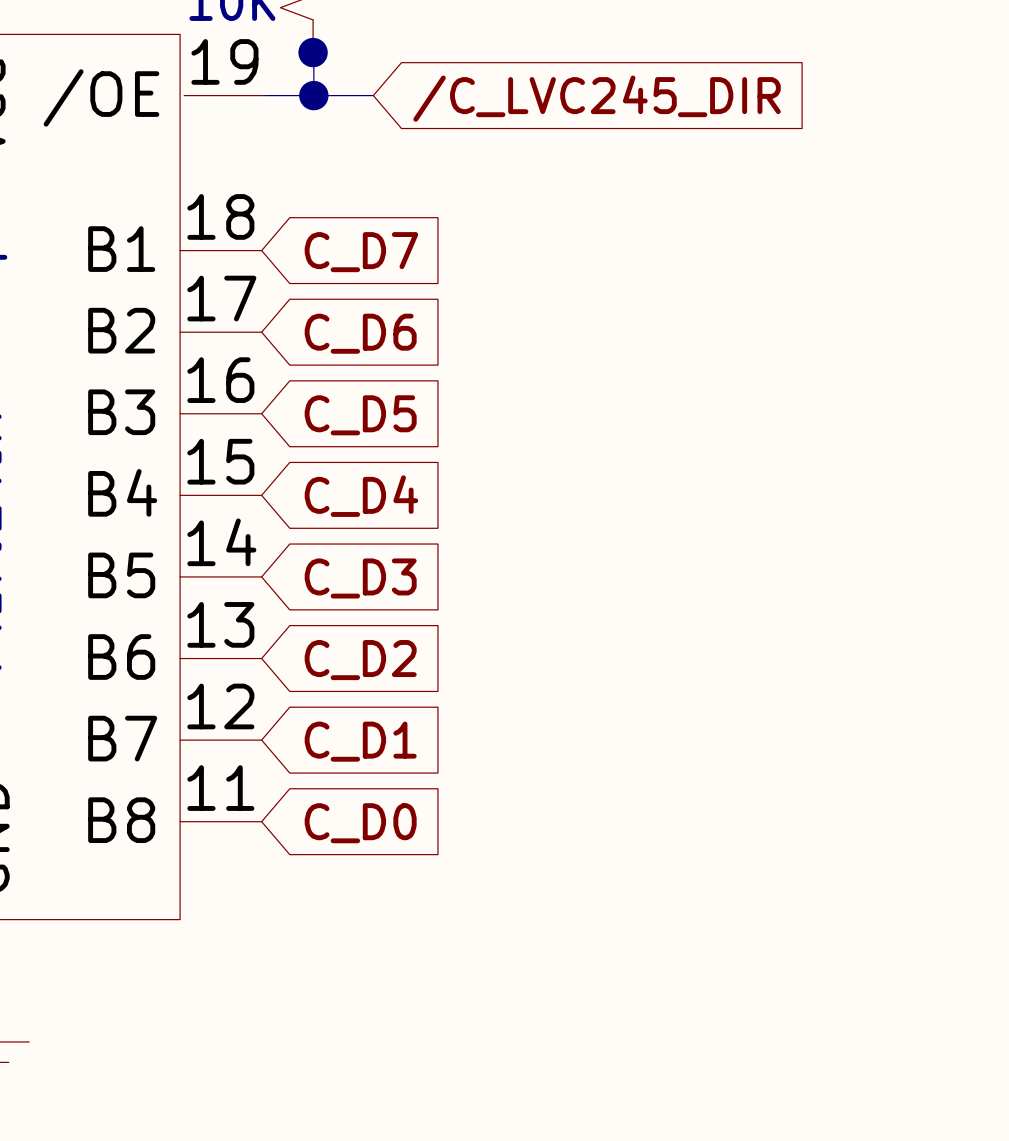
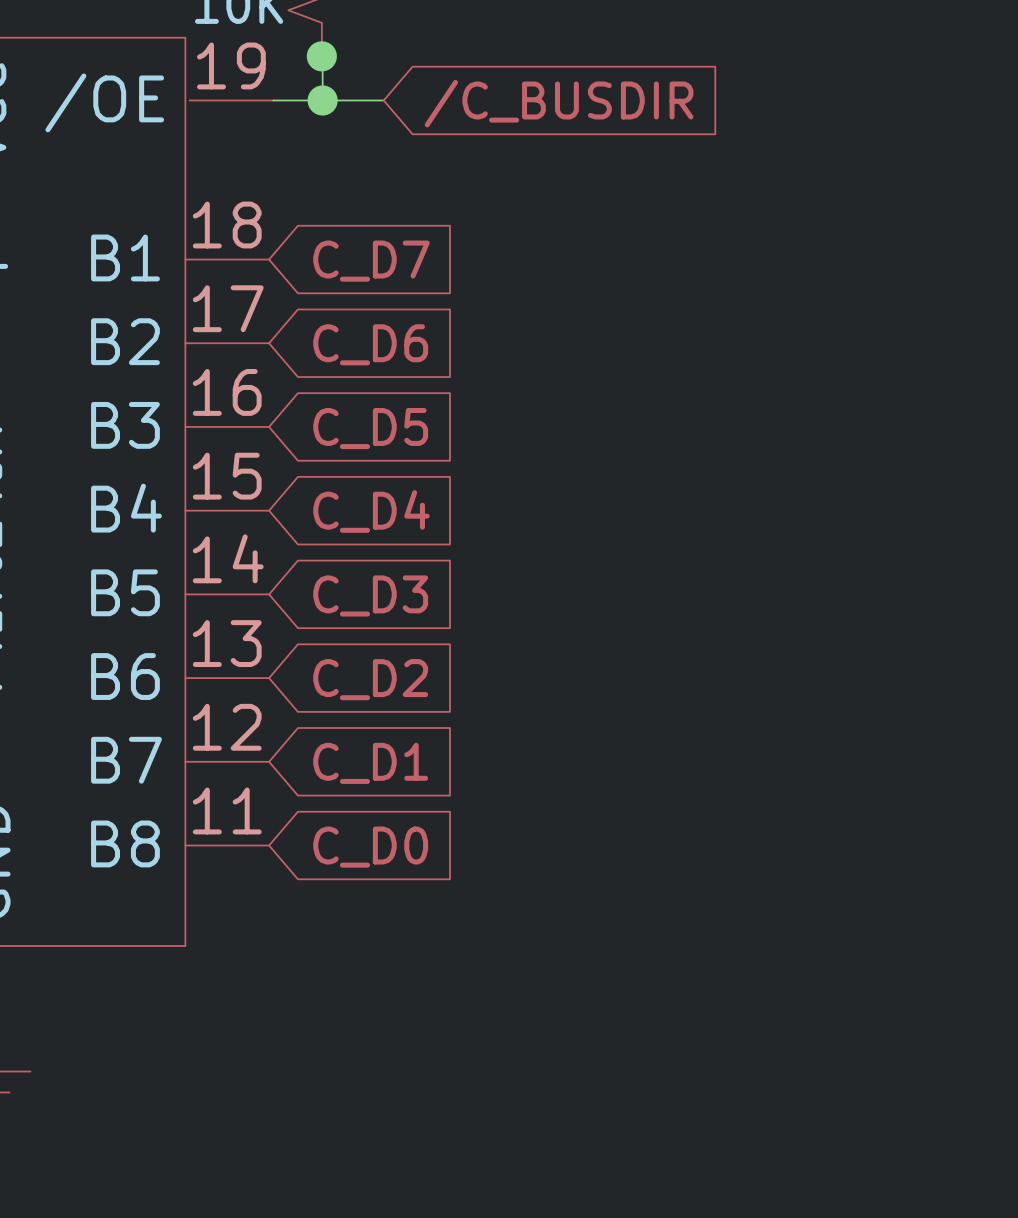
global label: /C_LVC245_DIR (597, 98) -> /C_BUSDIR (559, 103)

